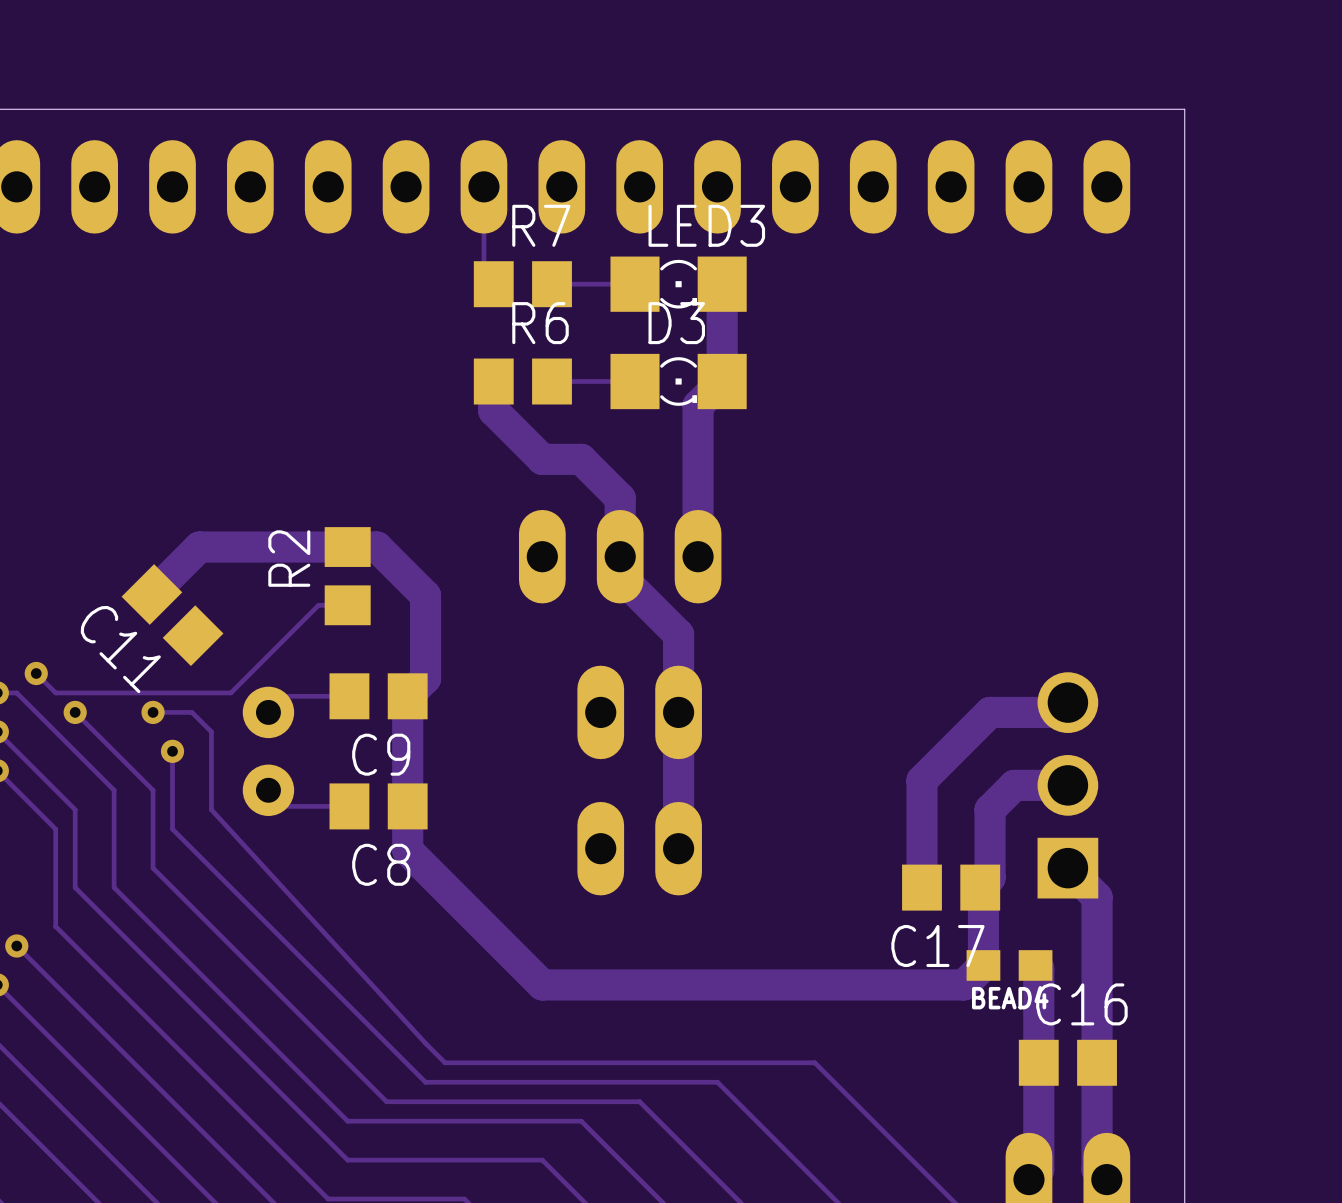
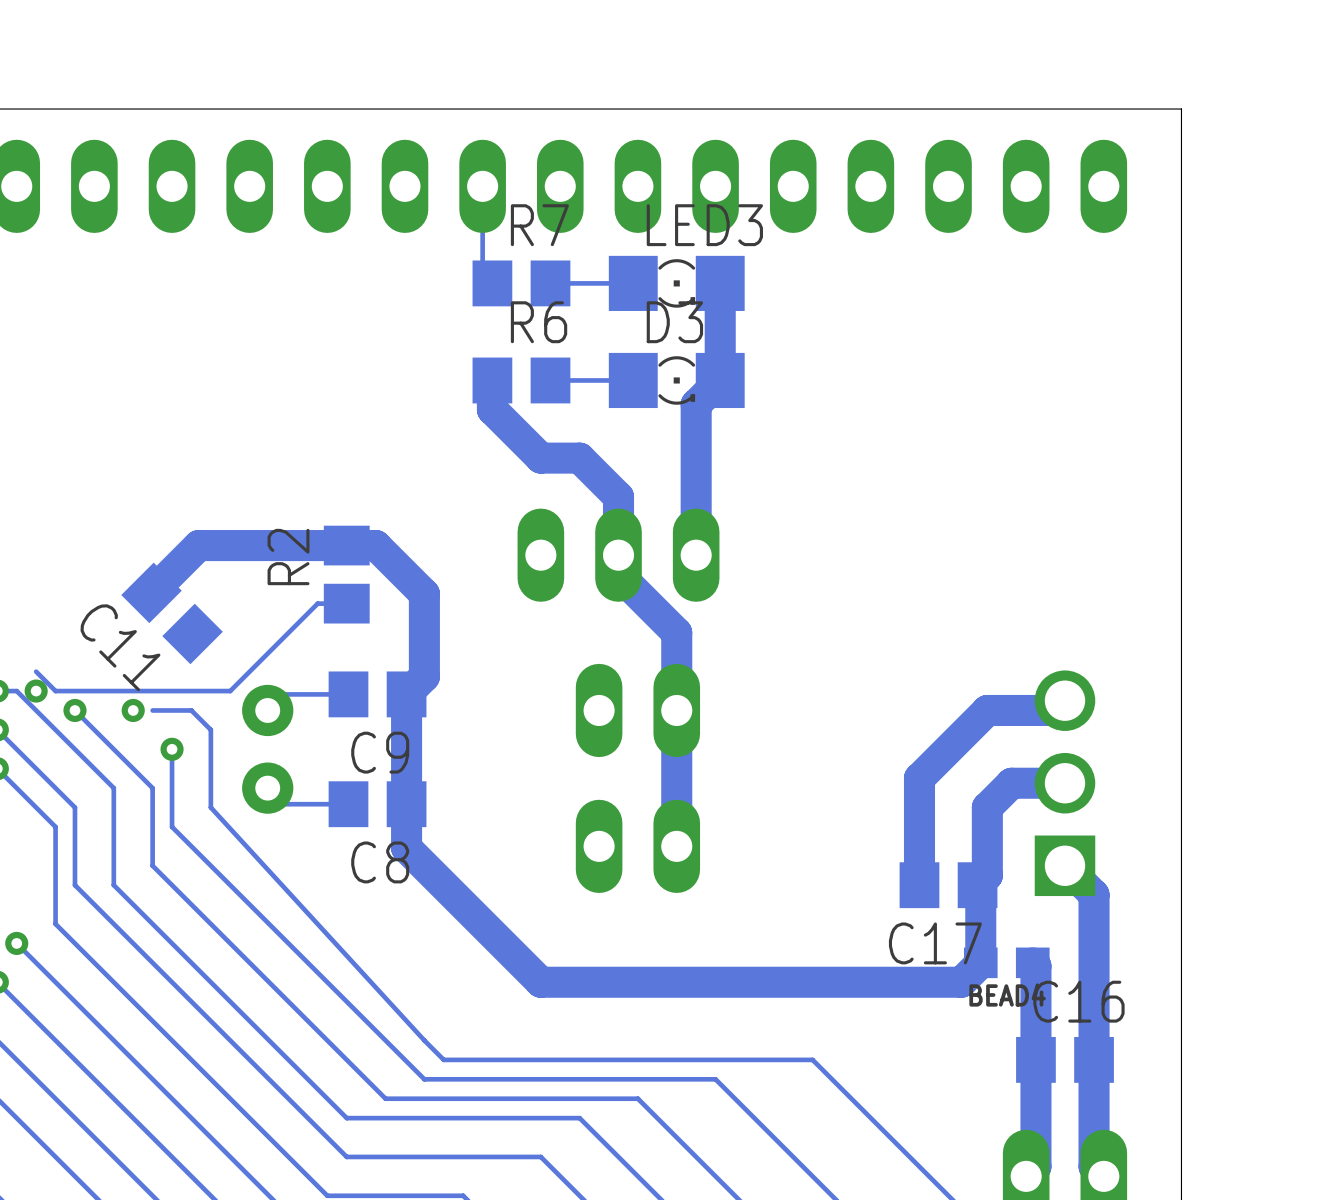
via position: (36, 673) -> (36, 691)
via position: (153, 712) -> (133, 710)

